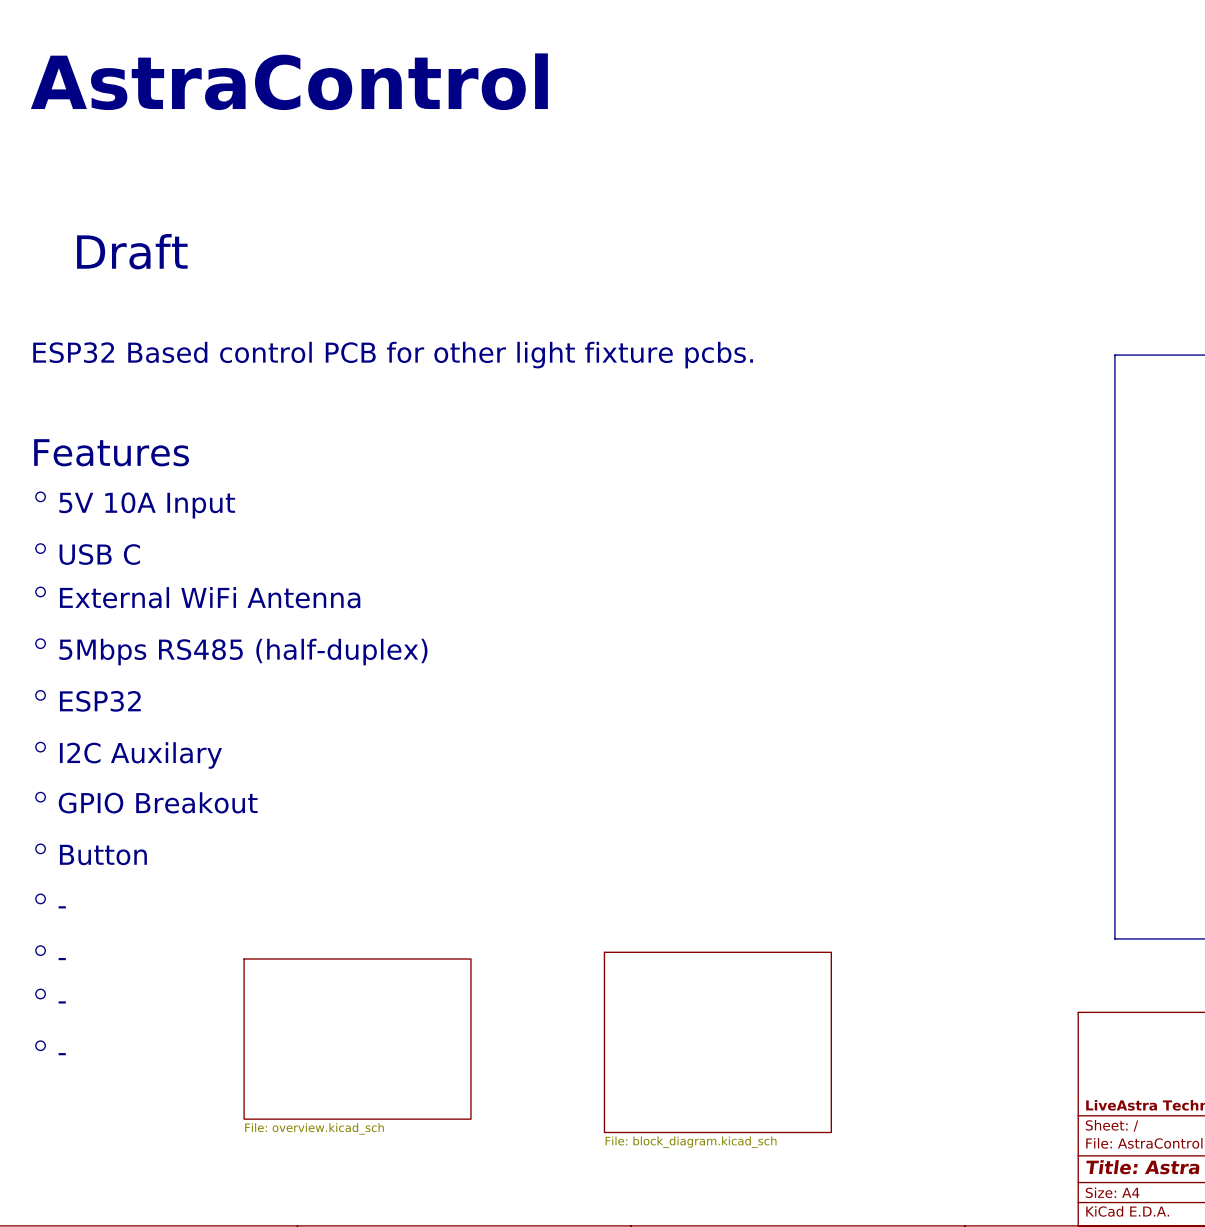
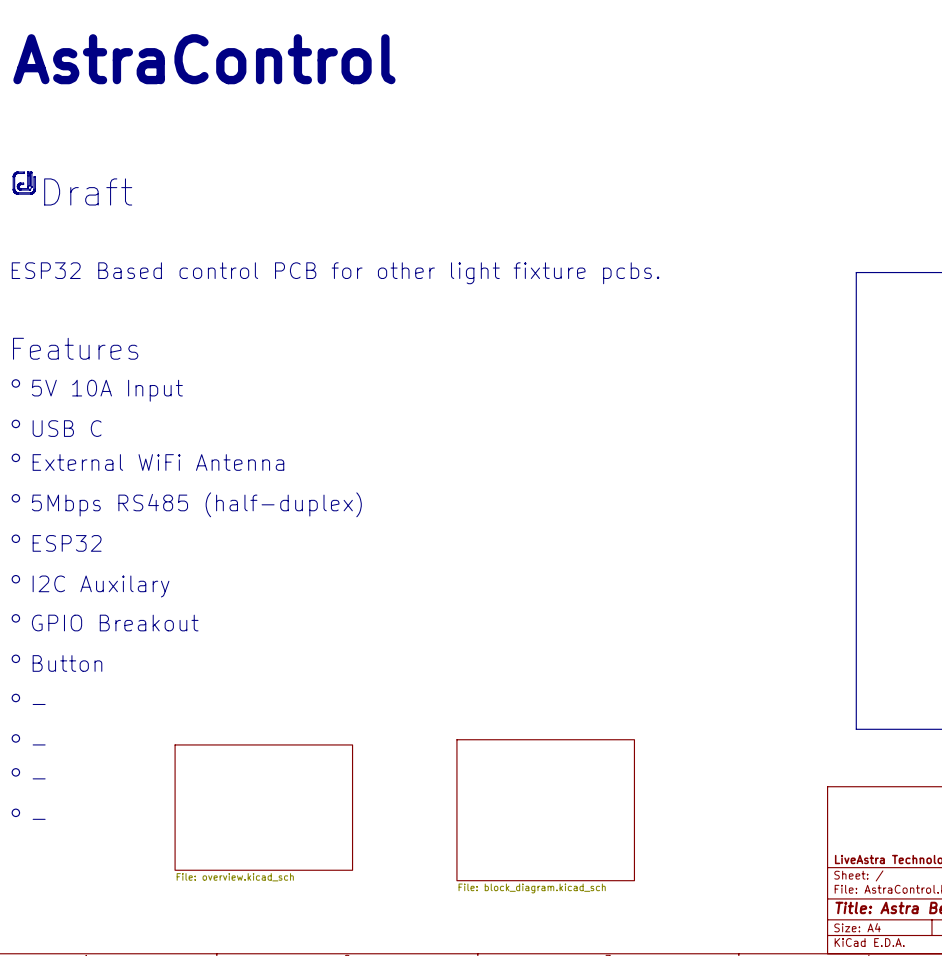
line: none -> (17, 172) (13, 176) (14, 192) (17, 194) (33, 193) (35, 189) (35, 176) (32, 192) (15, 191) (14, 175) (24, 173) (17, 172)
line: none -> (28, 172) (31, 172)
line: none -> (27, 172) (27, 186)
line: none -> (31, 172) (31, 186)
line: none -> (27, 173) (30, 173) (30, 174) (29, 174) (29, 173)
line: none -> (27, 175) (30, 175) (30, 185) (29, 185) (29, 175)
line: none -> (20, 184) (23, 183) (18, 184) (19, 189) (29, 190)
line: none -> (19, 185) (20, 188) (28, 188) (27, 186)
line: none -> (31, 186) (30, 189)

